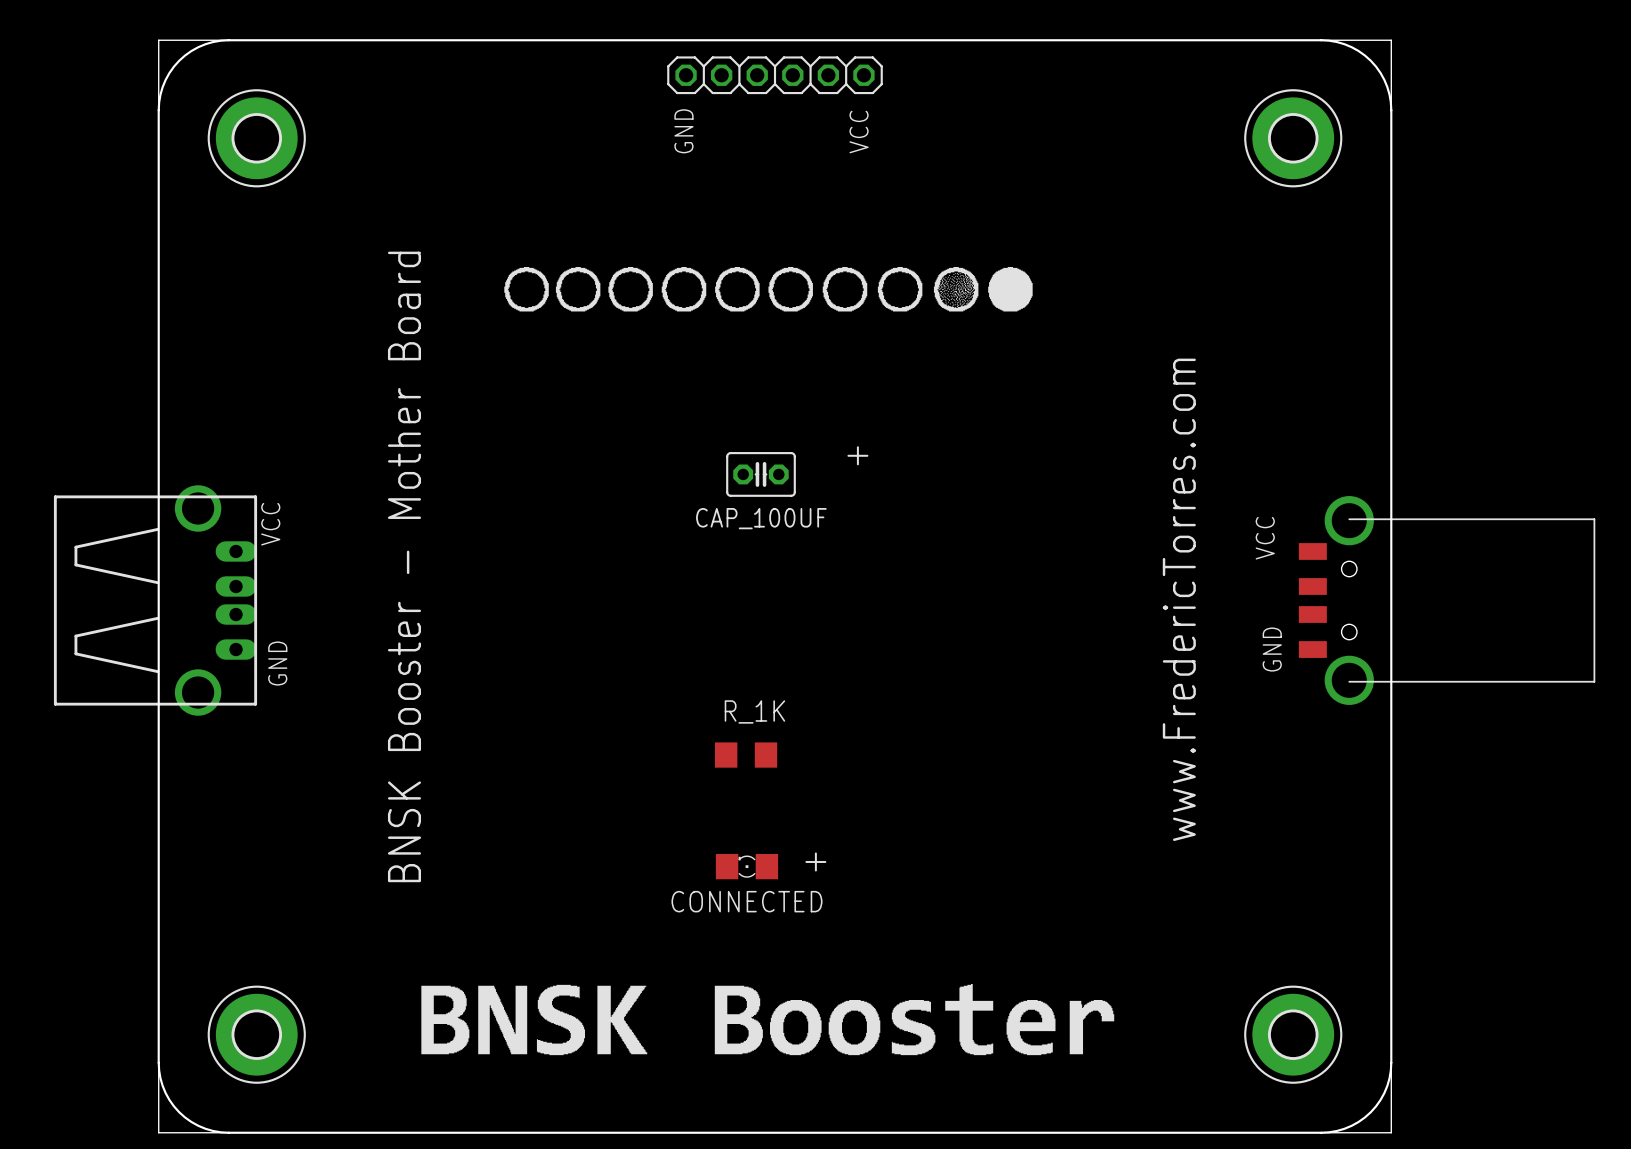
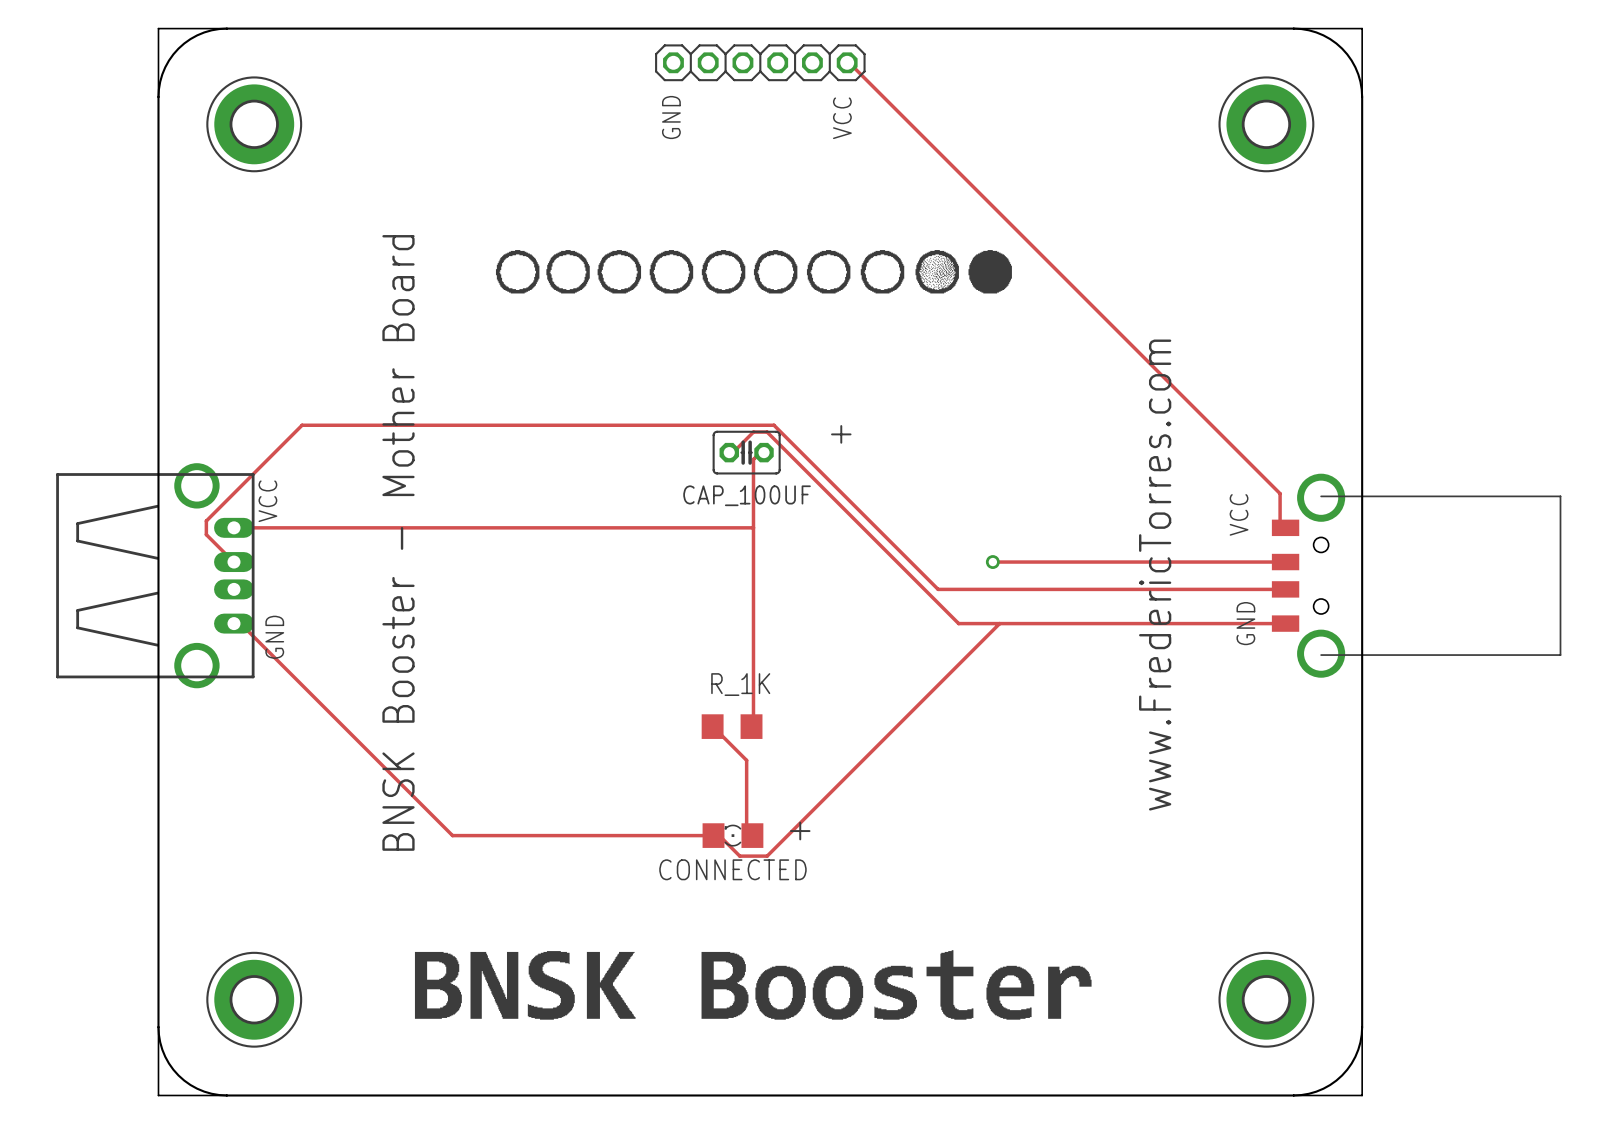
track: none -> (847, 62) (1280, 493) (1280, 527) (1285, 527)
track: none -> (729, 452) (732, 452) (753, 432) (767, 432) (958, 623) (1285, 623)
track: none -> (764, 452) (760, 452) (753, 459) (753, 726) (751, 726)
track: none -> (233, 527) (753, 527)
track: none -> (233, 562) (206, 534) (206, 521) (302, 425) (774, 425) (938, 589) (1285, 589)
track: none -> (992, 562) (1285, 562)
via: none -> (992, 562)
track: none -> (233, 623) (240, 623) (452, 835) (719, 835) (739, 856) (767, 856) (999, 623)
track: none -> (712, 726) (746, 760) (746, 835) (752, 835)

